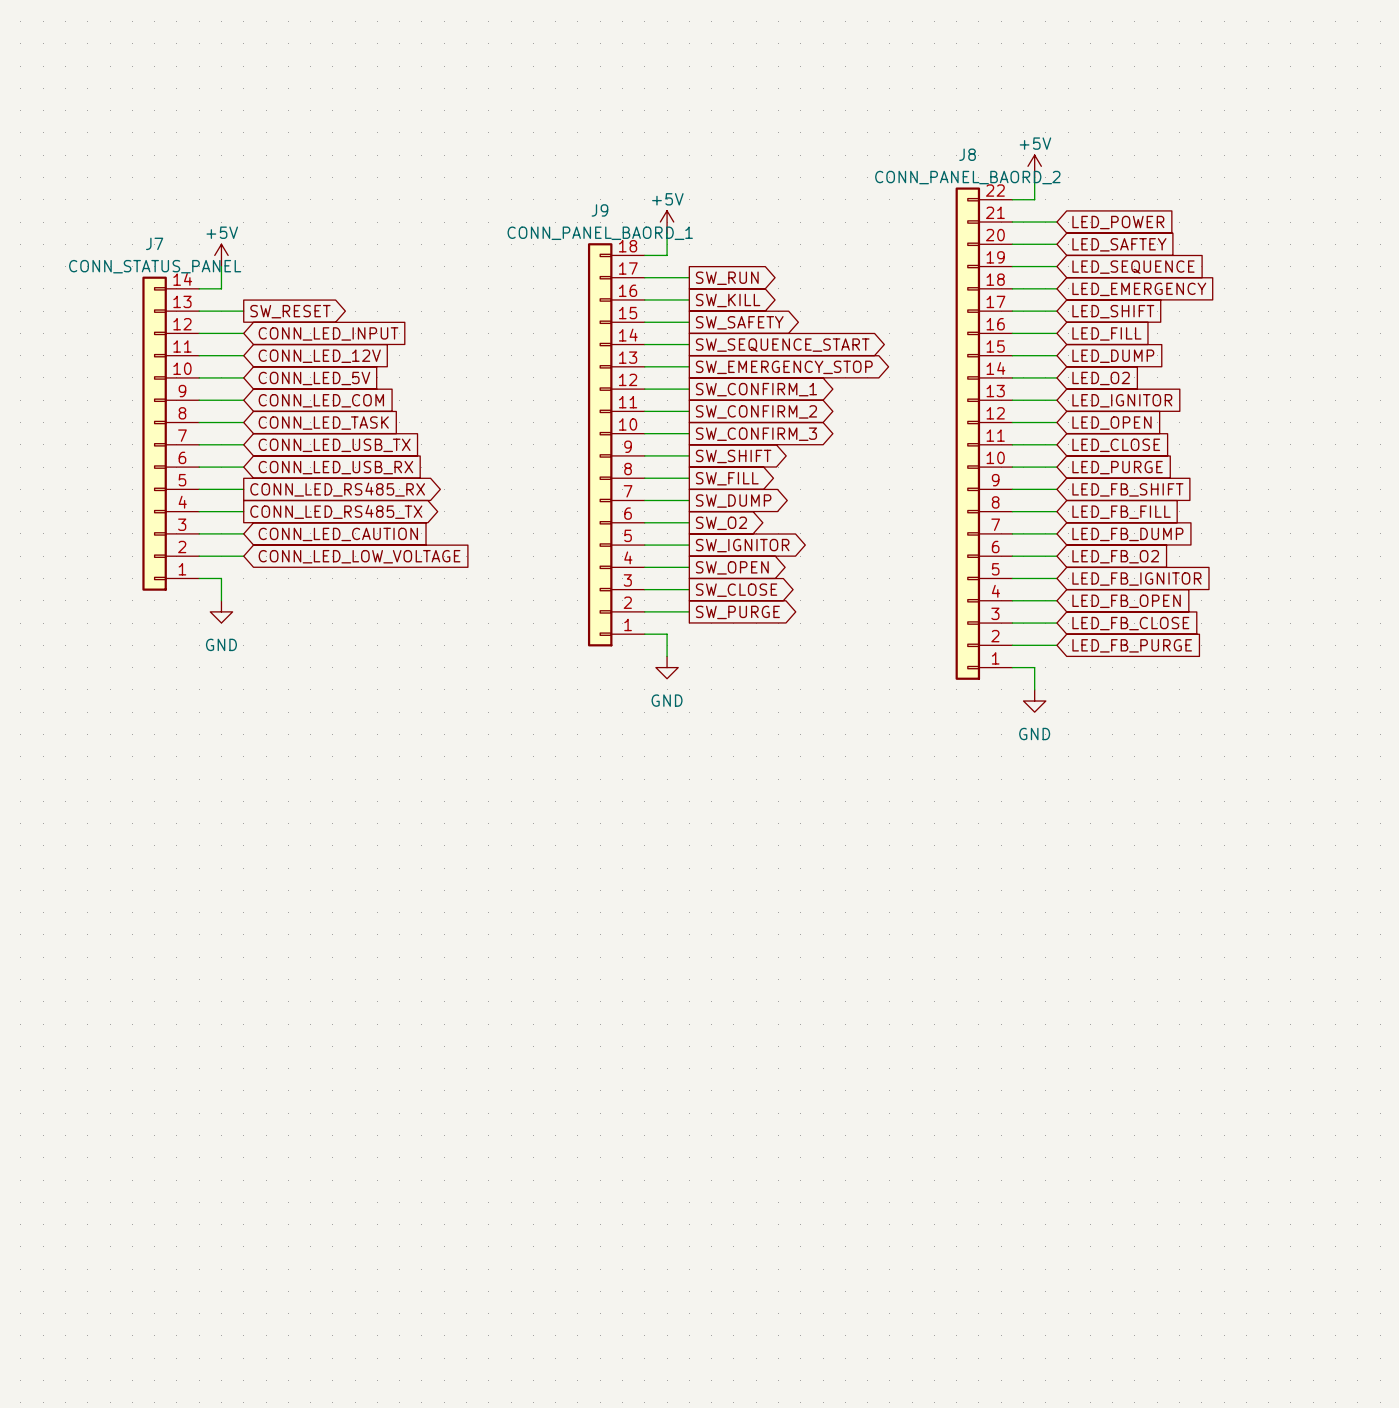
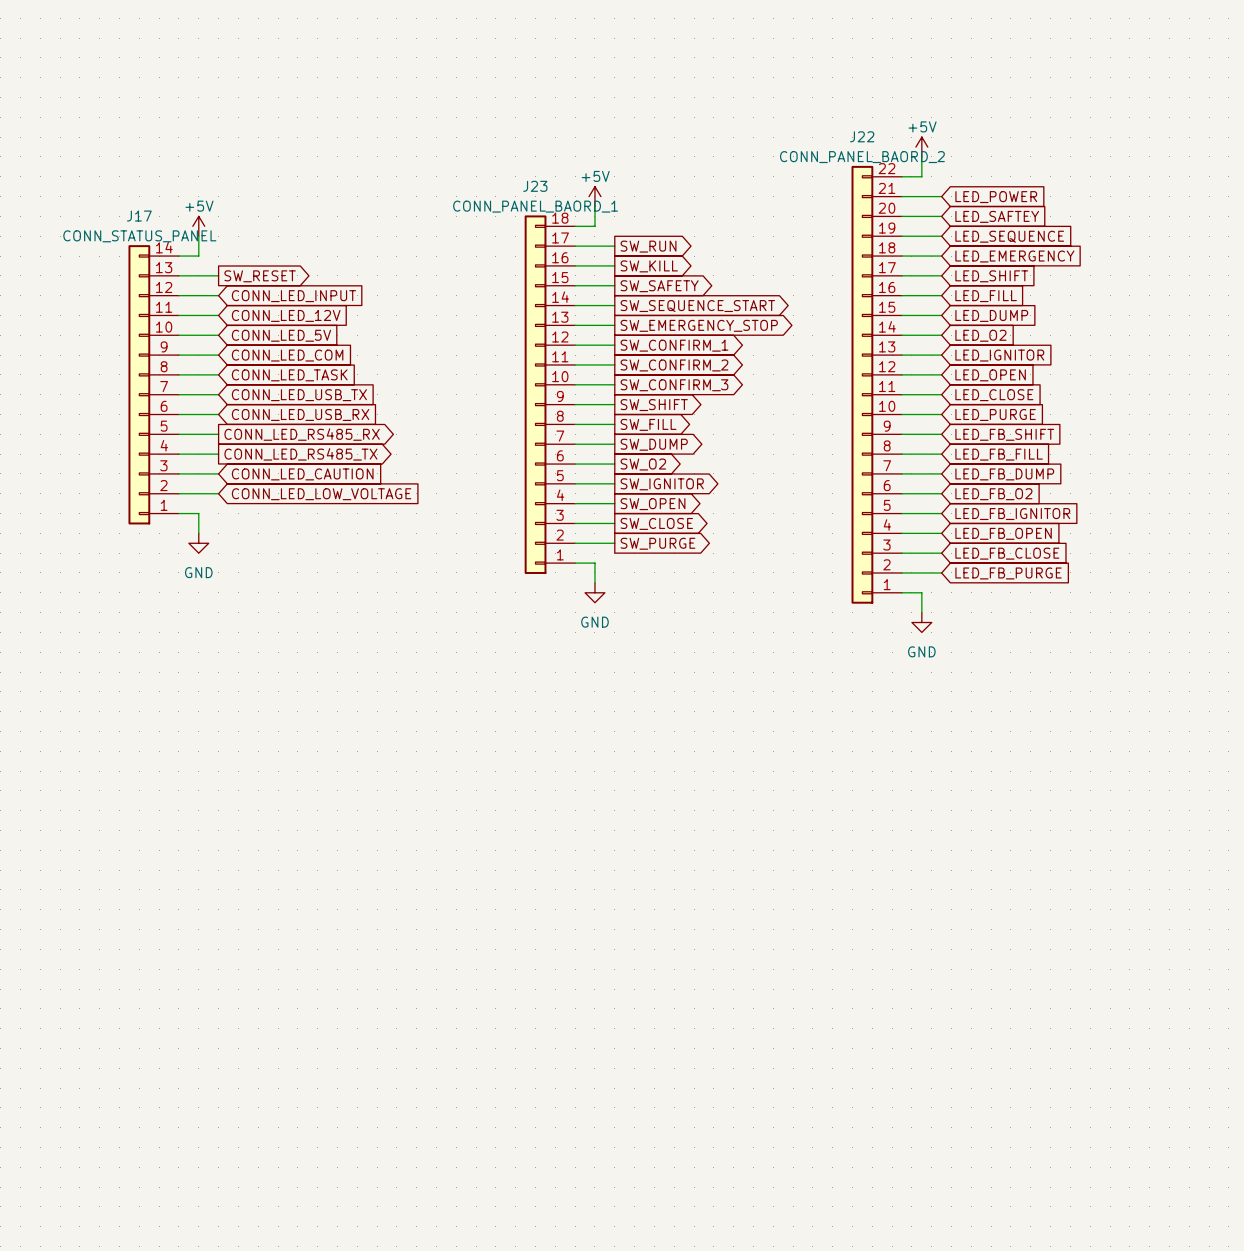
J8 name: J8 (967, 154) -> J22 (862, 136)
J9 name: J9 (599, 210) -> J23 (535, 186)
J7 name: J7 (154, 243) -> J17 (139, 216)

